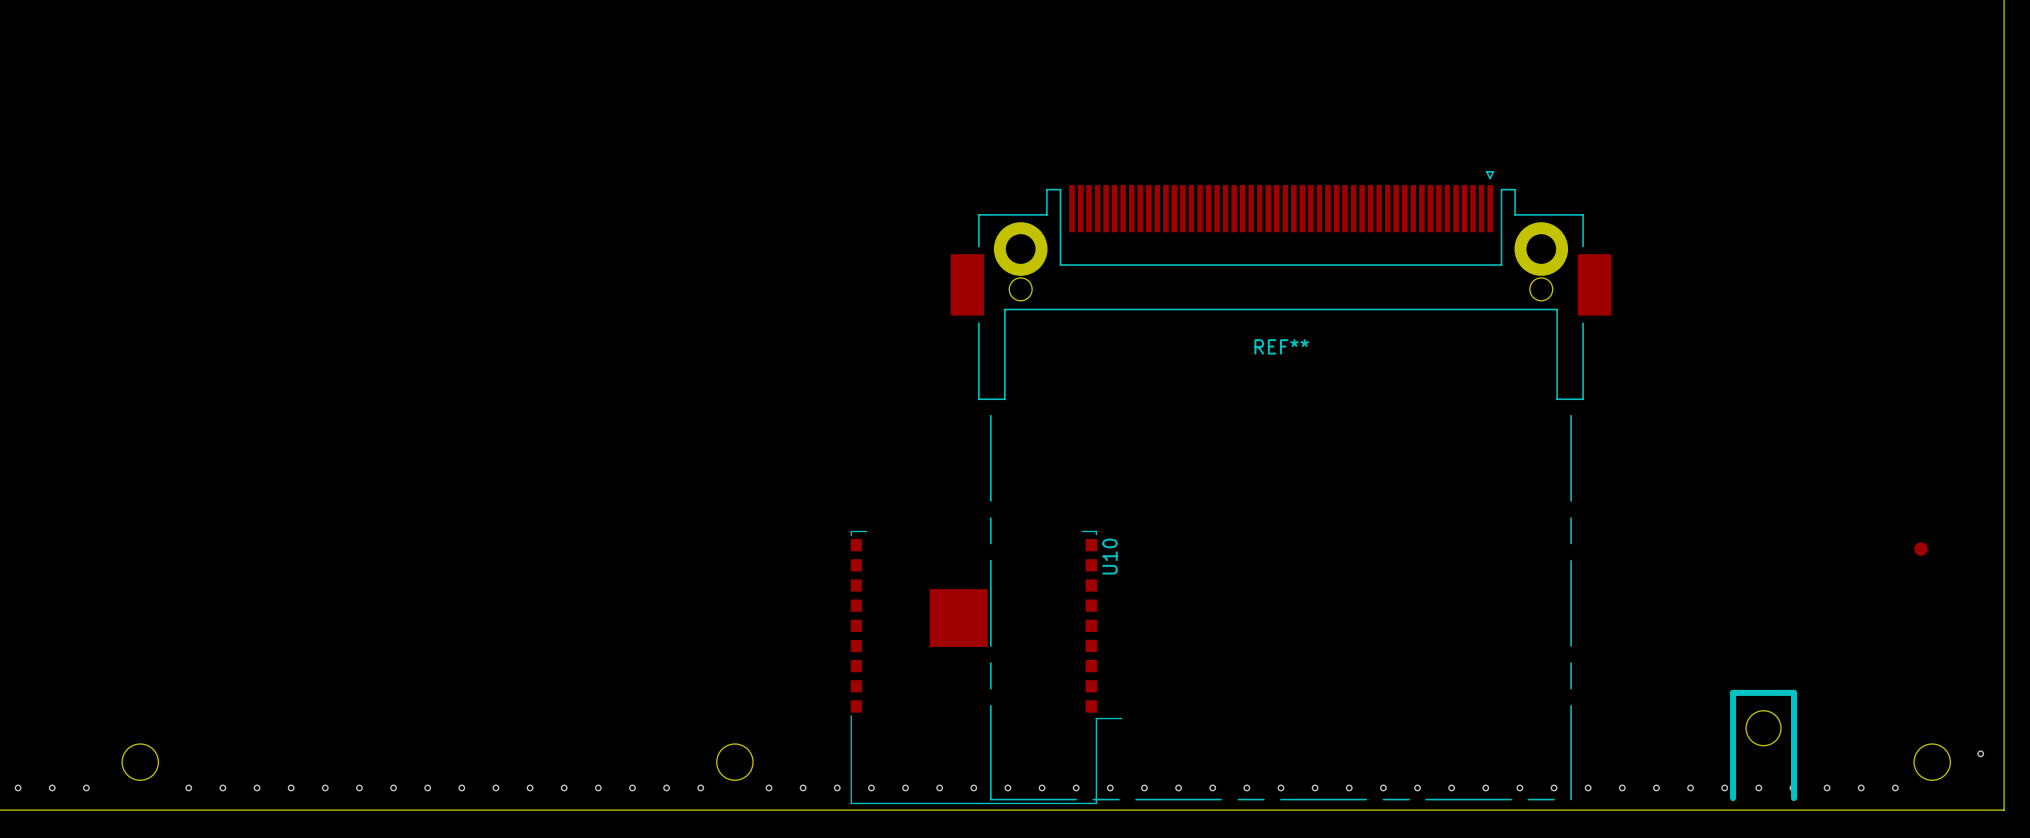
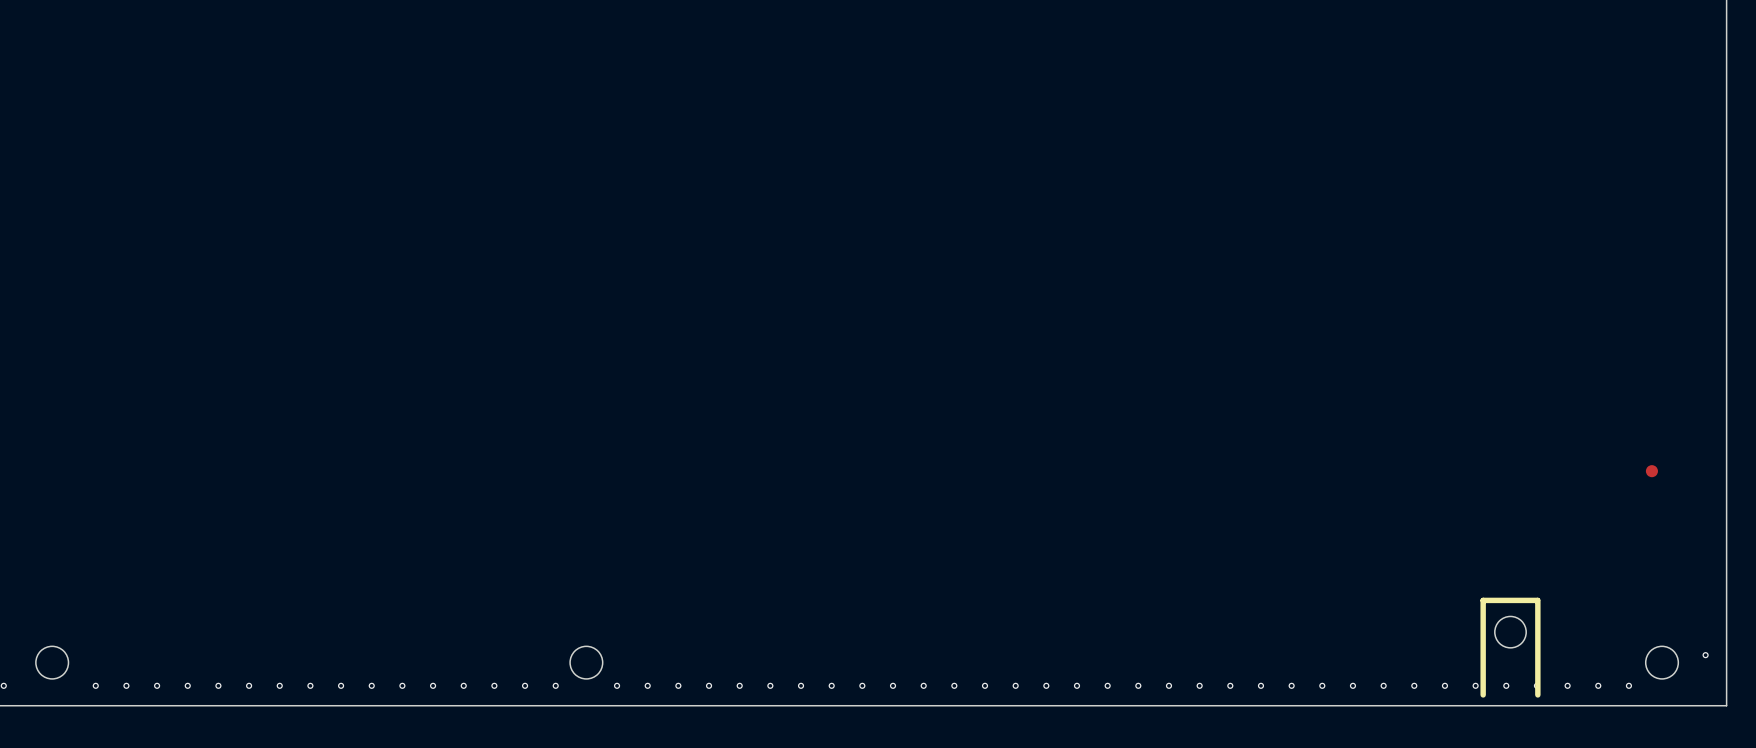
REF**: (1280, 485) -> none
U10: (986, 667) -> none

